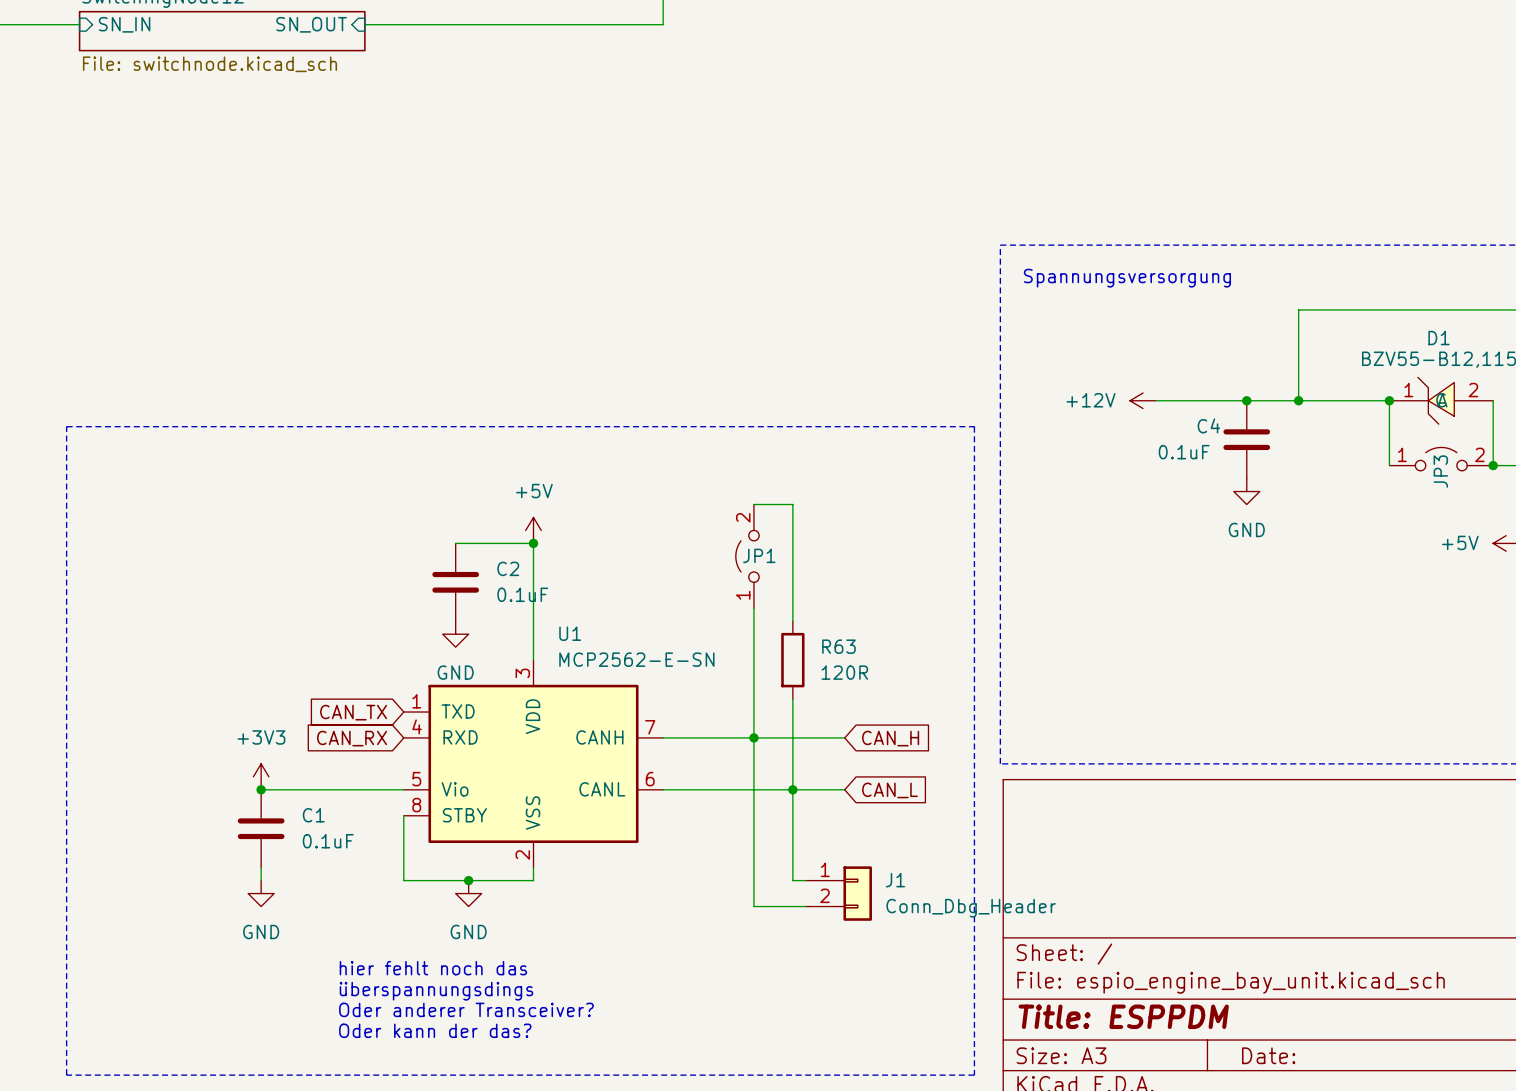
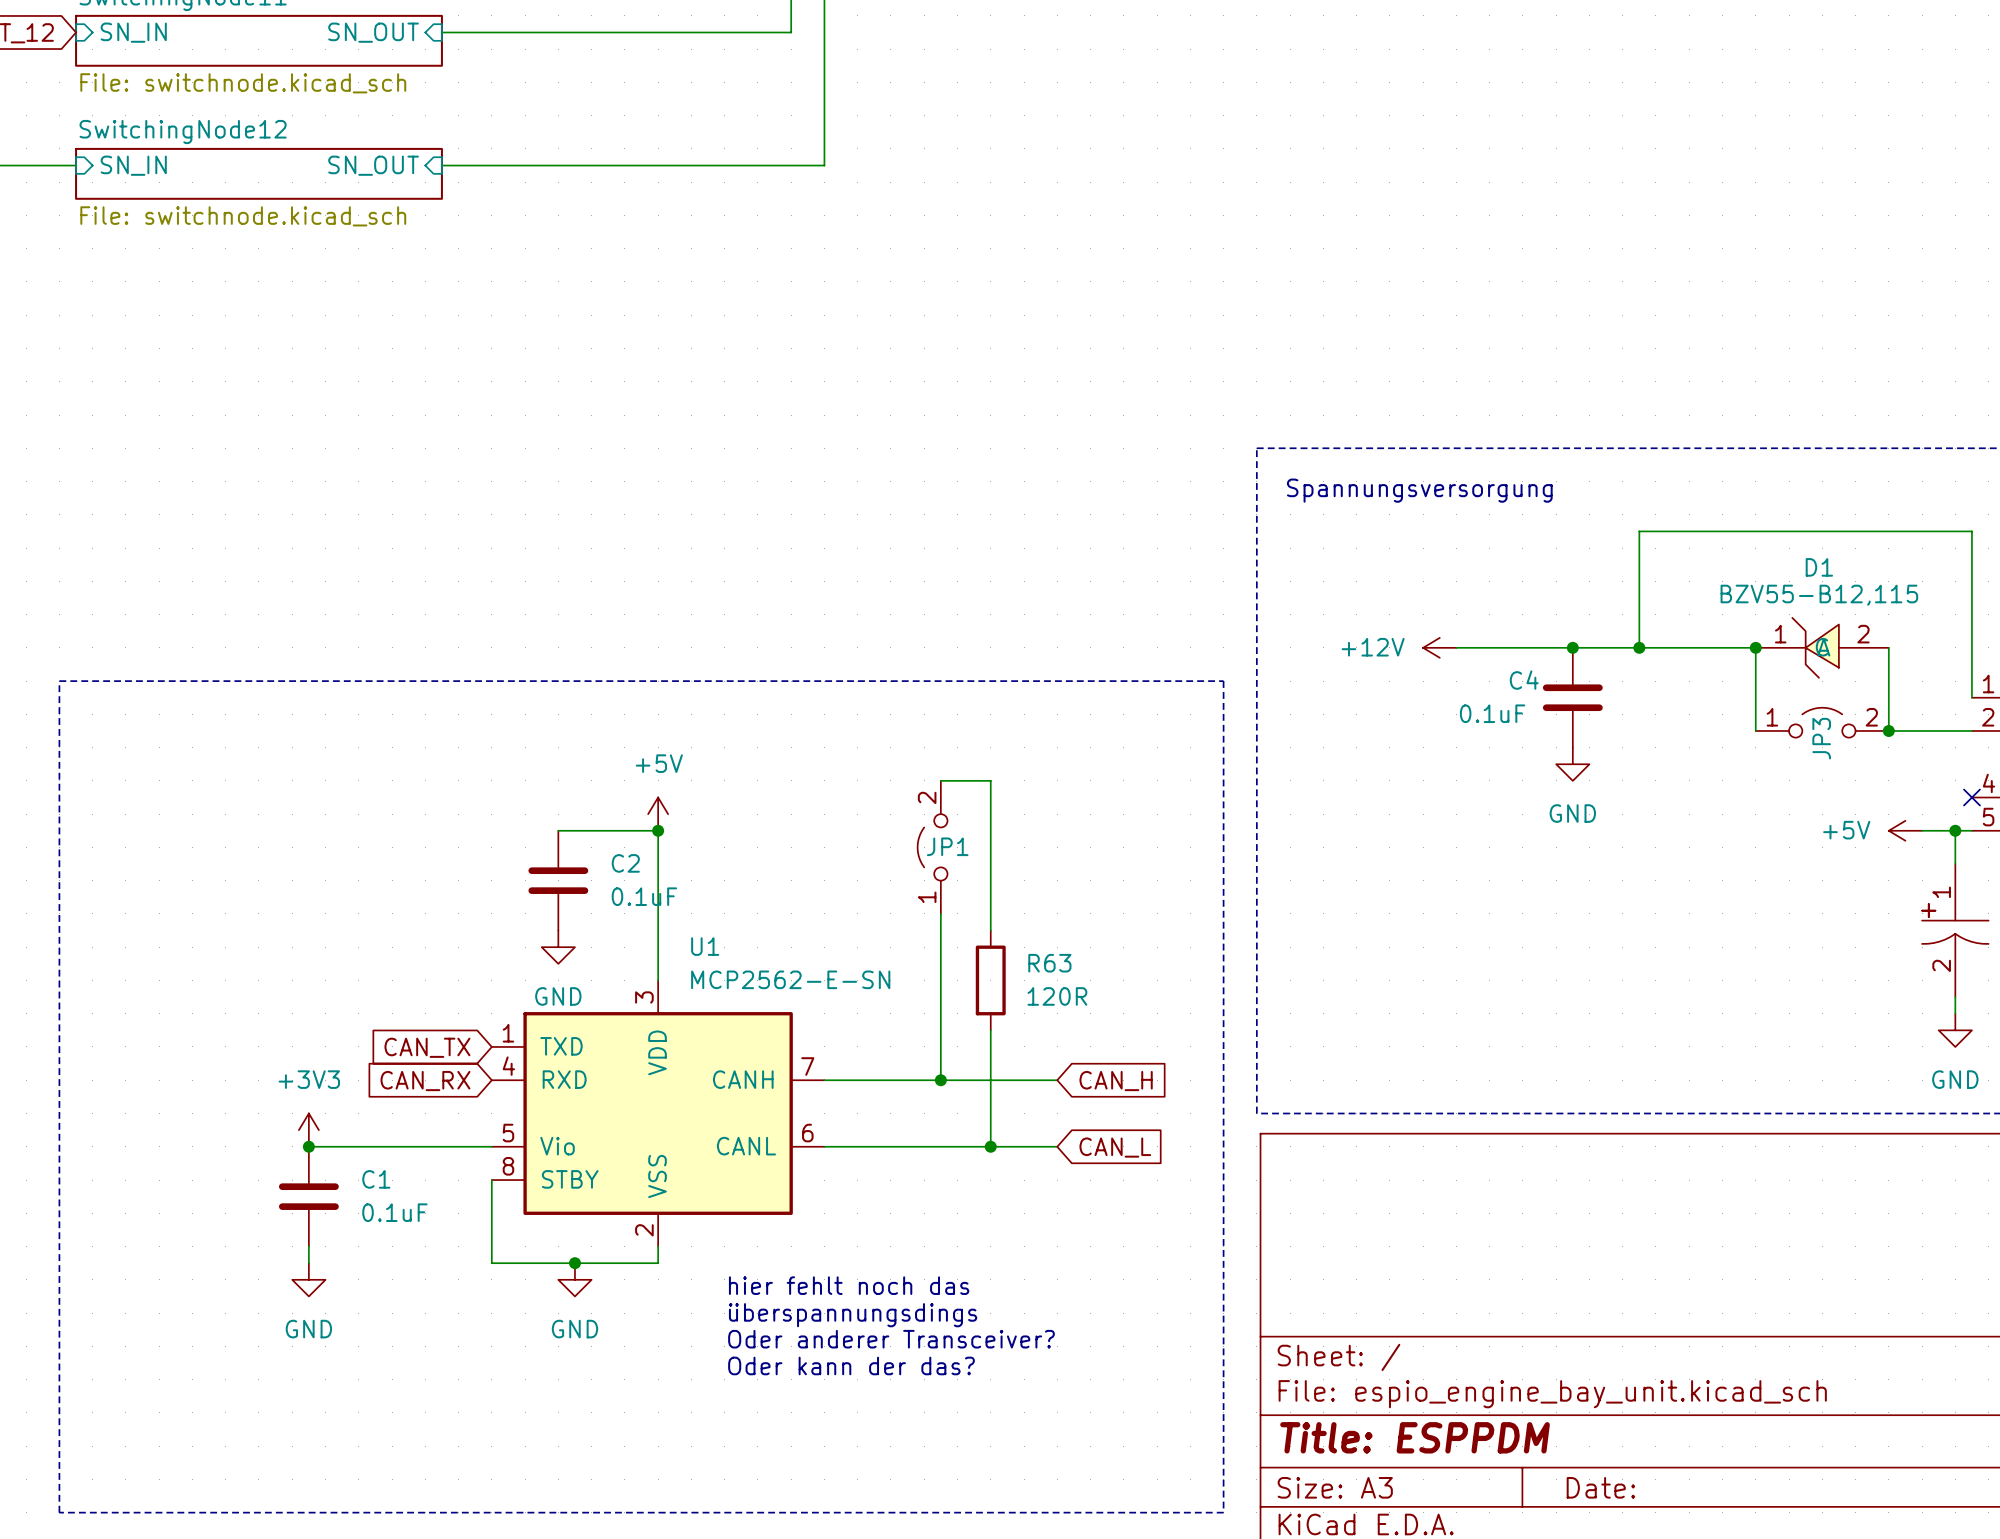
wire: (753, 737) (753, 906) (805, 906) -> none
wire: (792, 789) (792, 880) (805, 880) -> none
J1: Conn_Dbg_Header (838, 893) -> none
text: none -> hier fehlt noch das (849, 1285)
text: none -> überspannungsdings (853, 1315)
text: none -> Oder anderer Transceiver? (891, 1339)
text: none -> Oder kann der das? (851, 1365)
text: hier fehlt noch das (433, 968) -> none
text: überspannungsdings (436, 991) -> none
text: Oder anderer Transceiver? (466, 1009) -> none
text: Oder kann der das? (435, 1030) -> none

